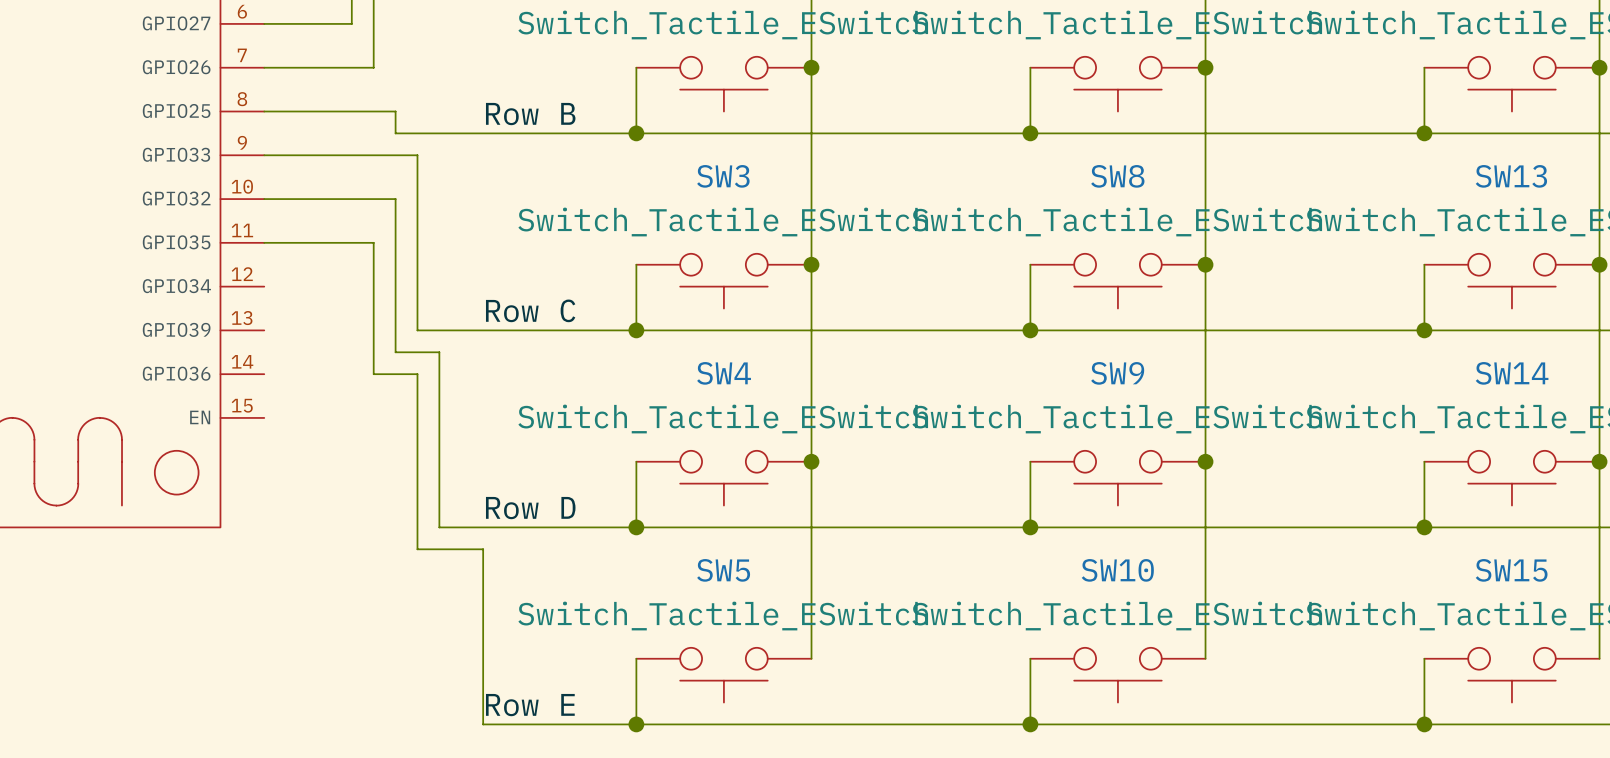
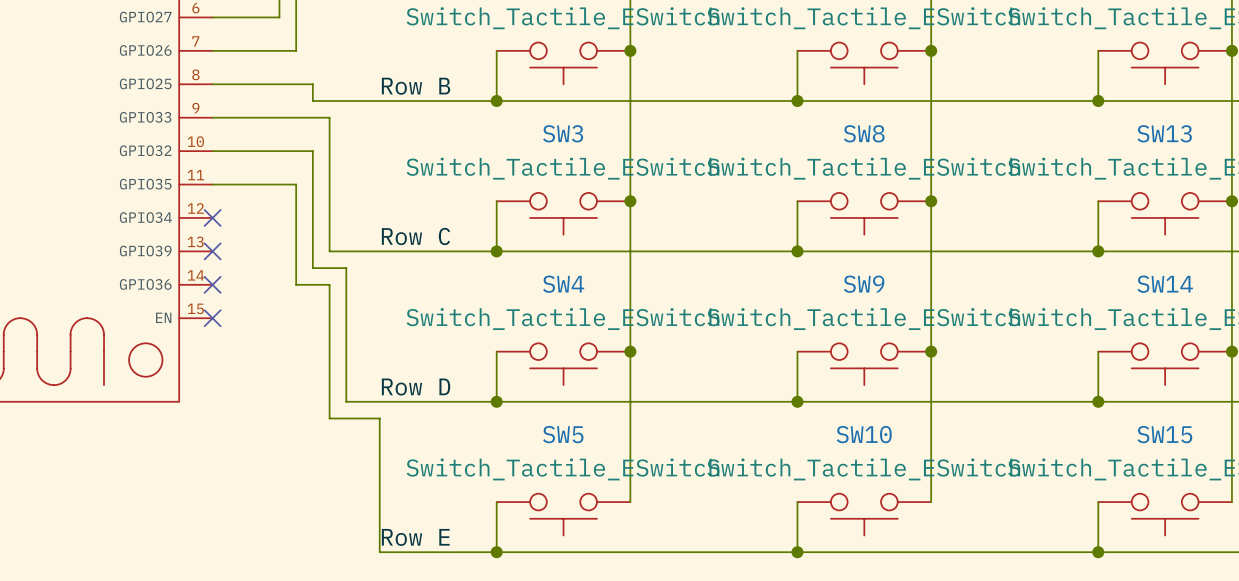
no-connect mark: none -> (212, 217)
no-connect mark: none -> (212, 251)
no-connect mark: none -> (212, 284)
no-connect mark: none -> (212, 318)

